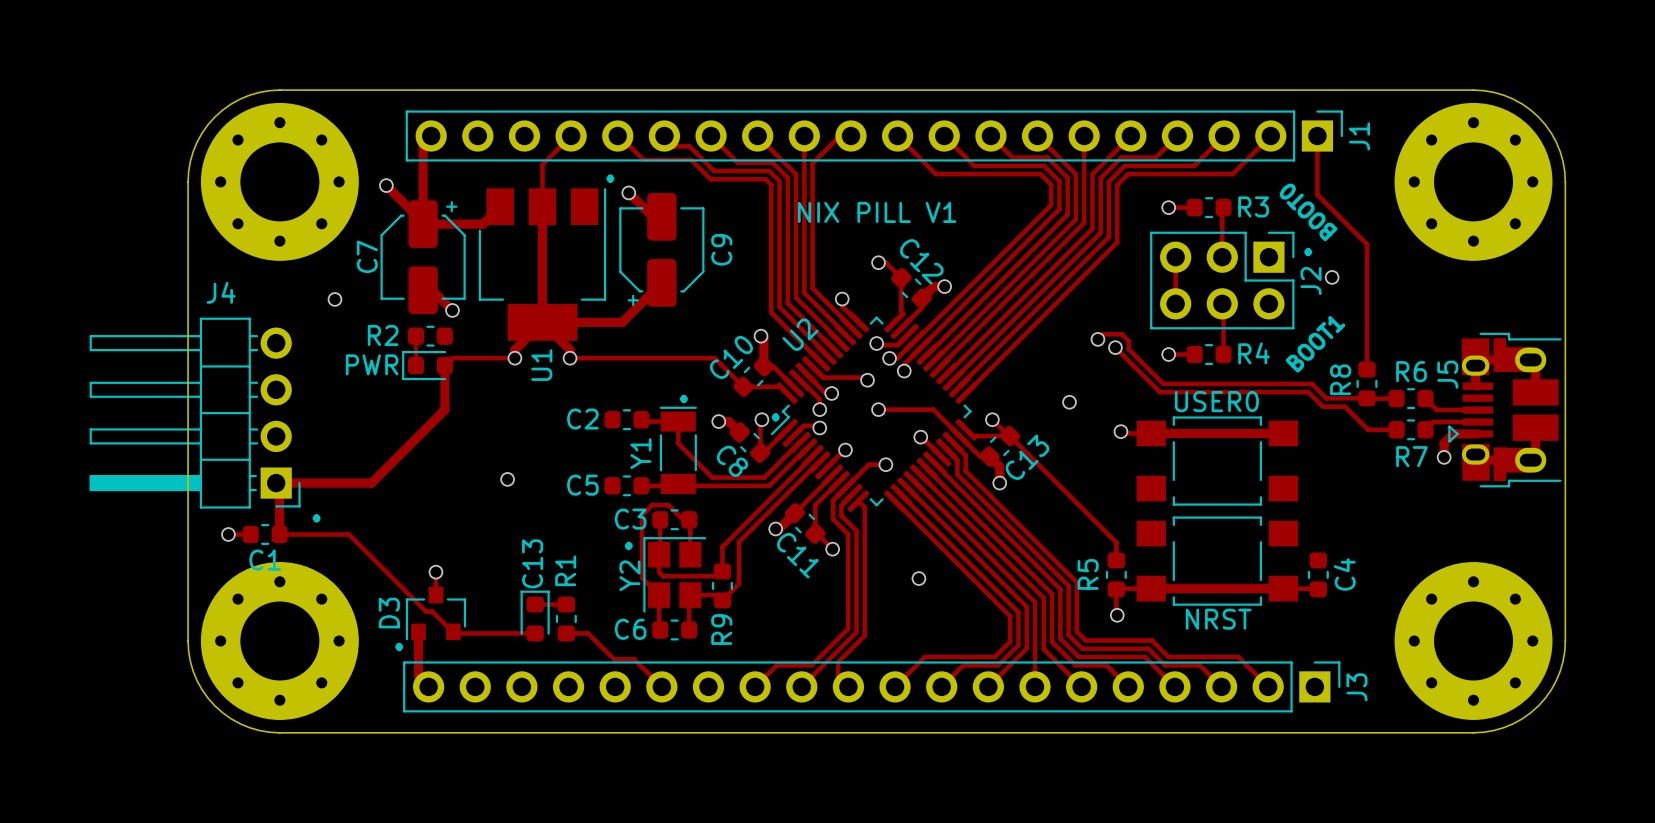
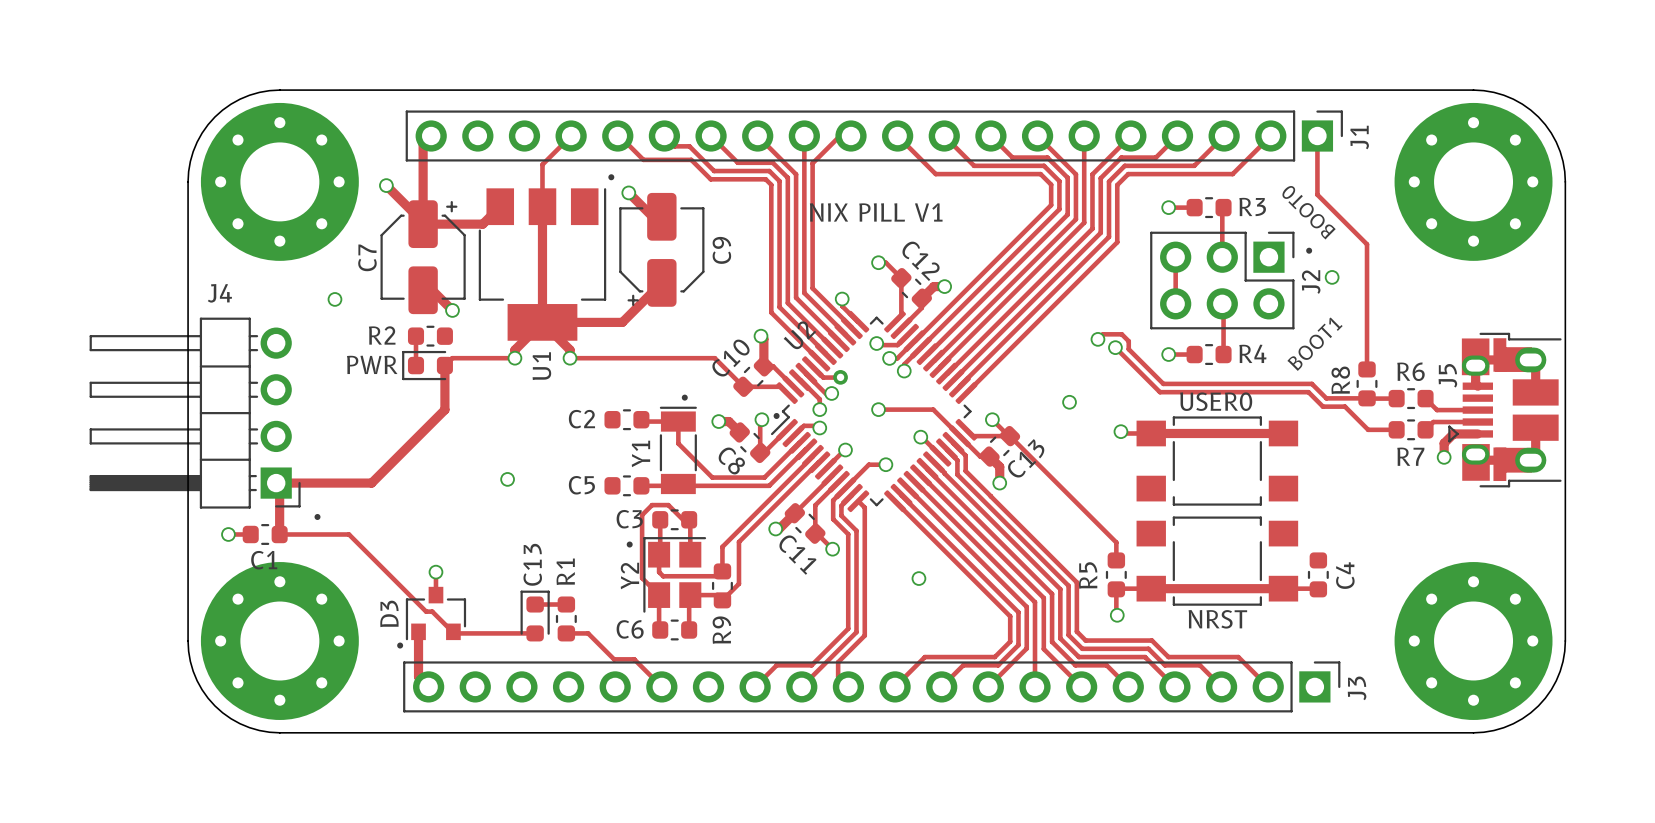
track: (840, 377) (864, 377) (867, 380) -> none
via: none -> (840, 377)
via: (867, 380) -> none

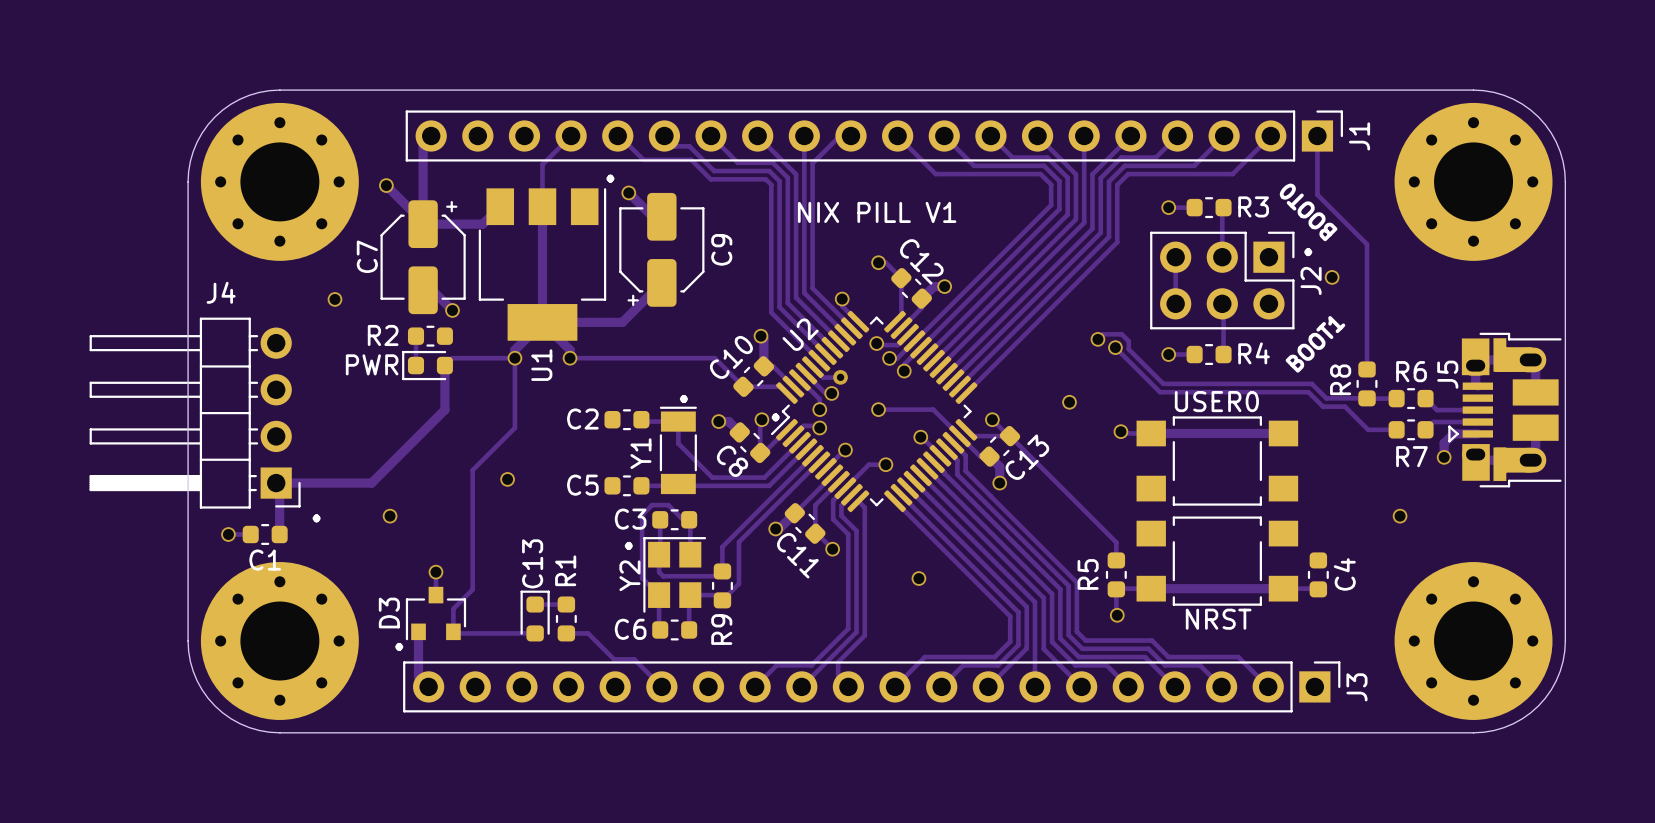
track: none -> (514, 358) (514, 427) (472, 470) (472, 589) (453, 608) (453, 631)
via: none -> (390, 516)
via: none -> (1400, 516)
track: (279, 534) (349, 534) (426, 611) (432, 611) (452, 631) -> none

